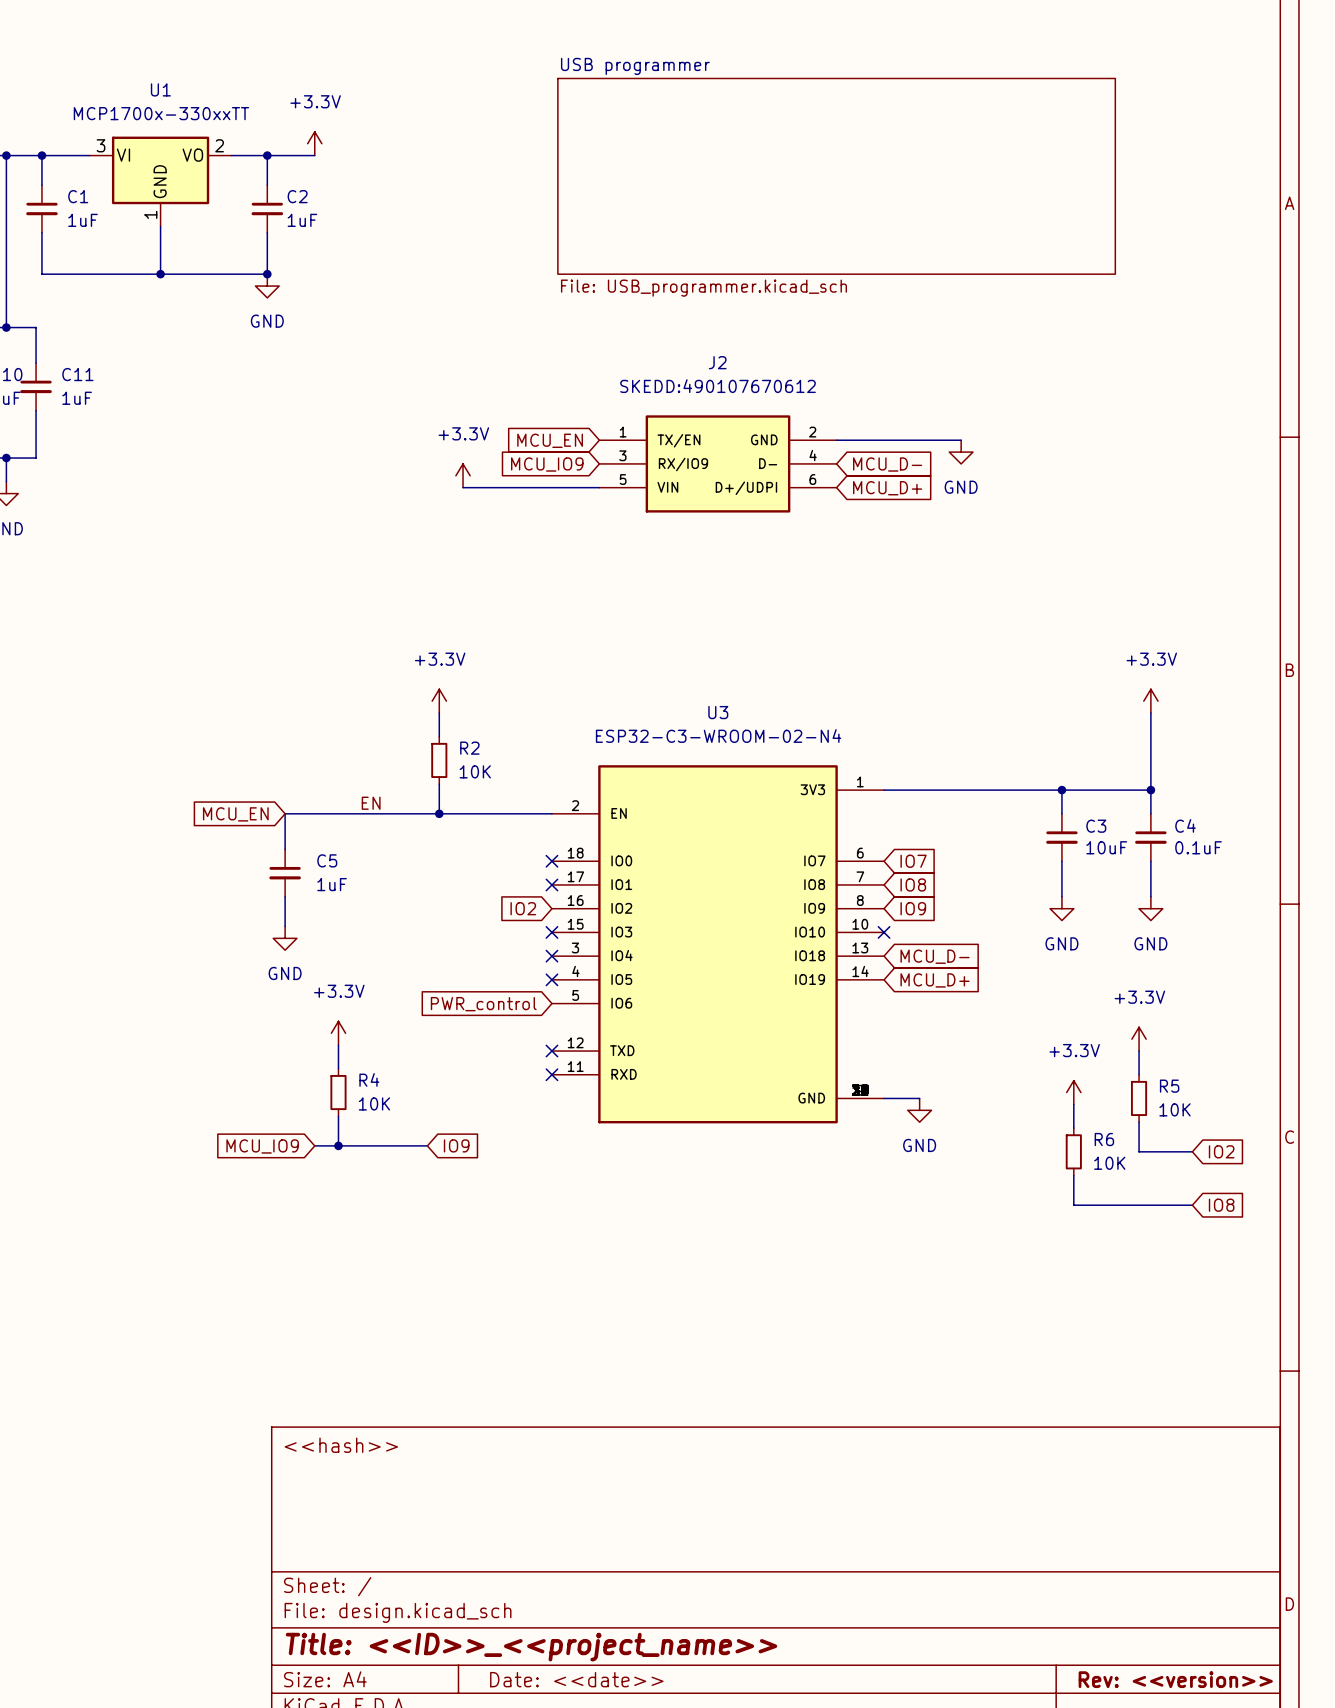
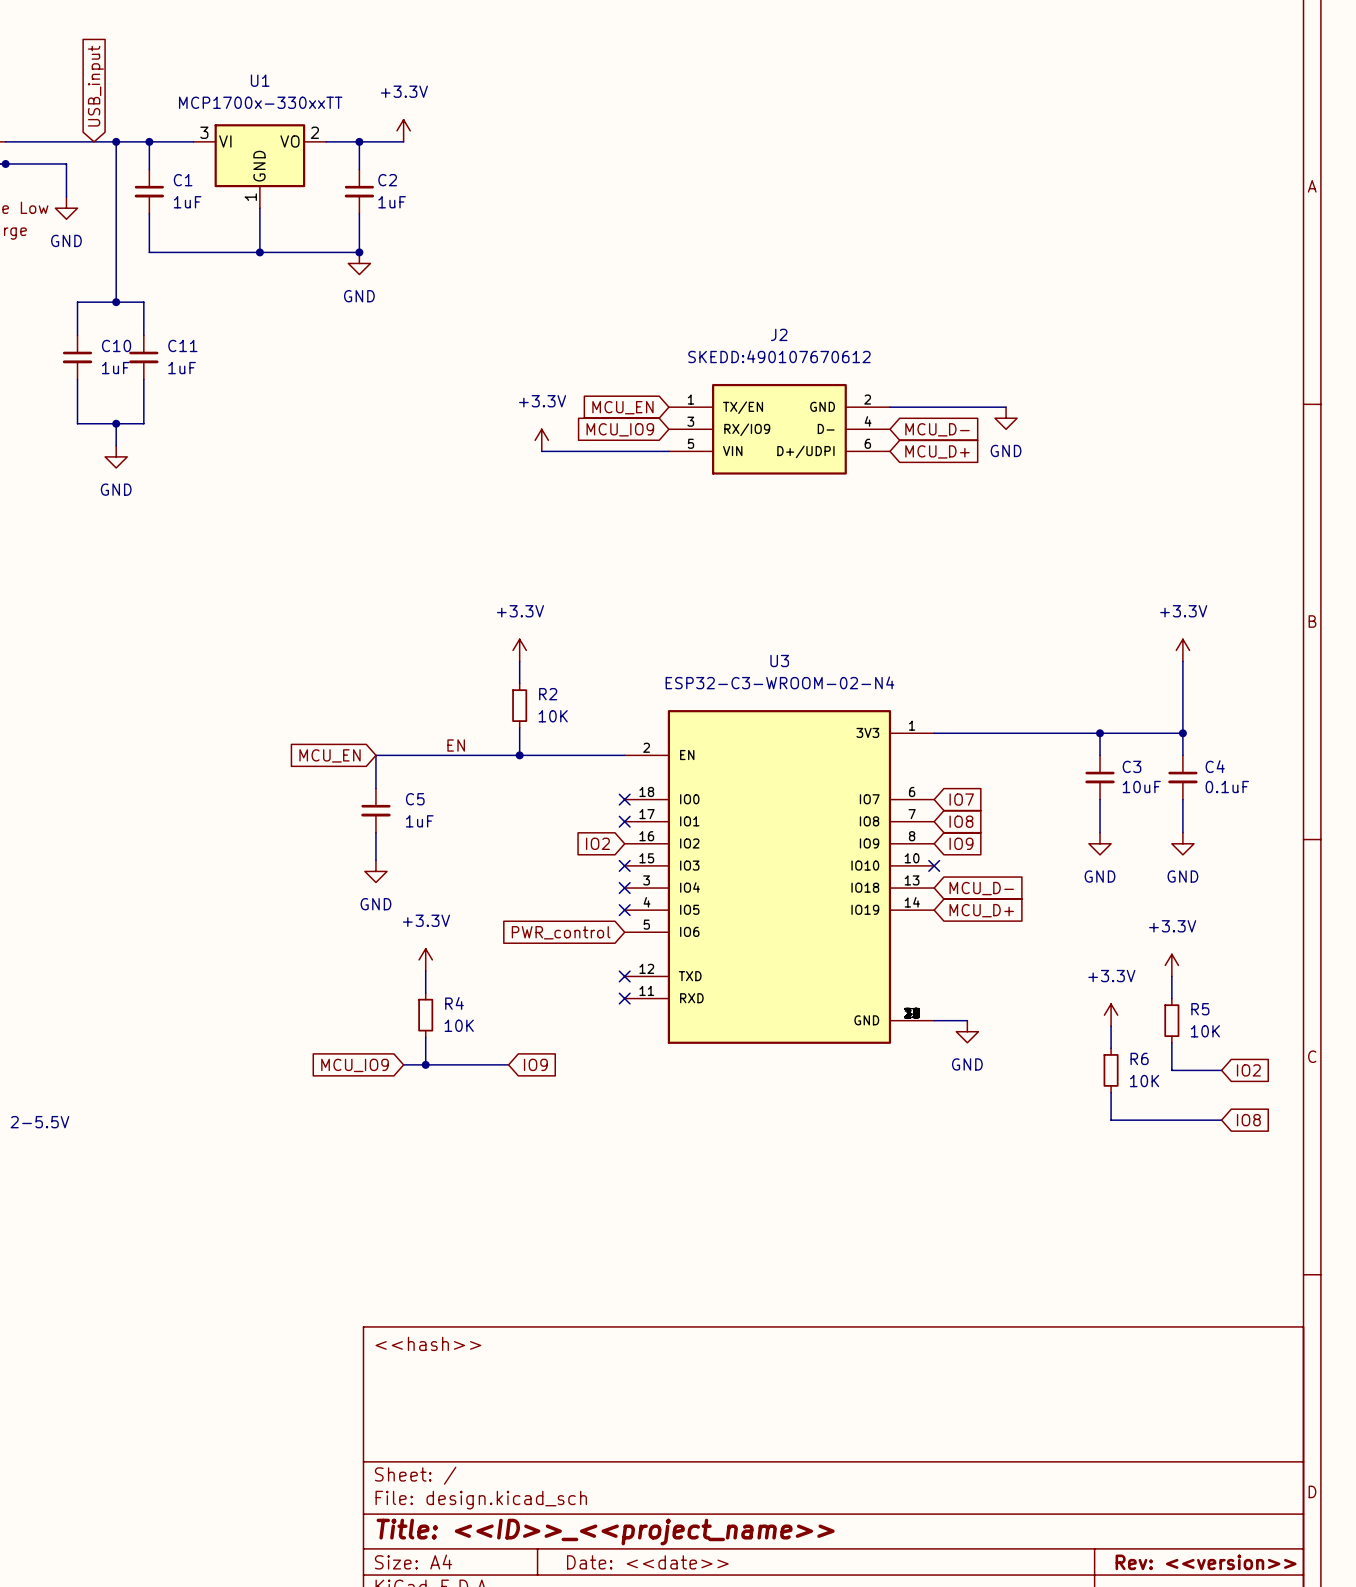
sheet USB programmer: File: USB_programmer.kicad_sch (836, 176) -> none

